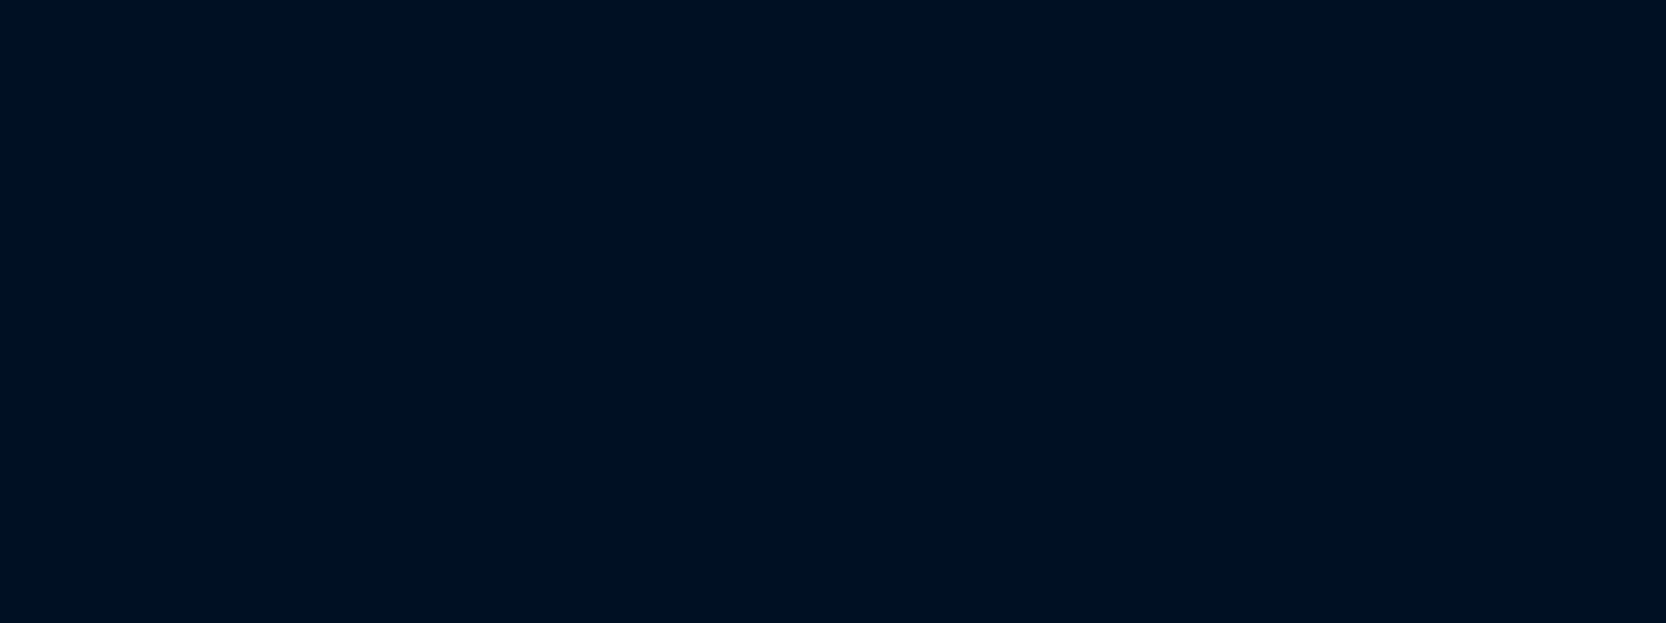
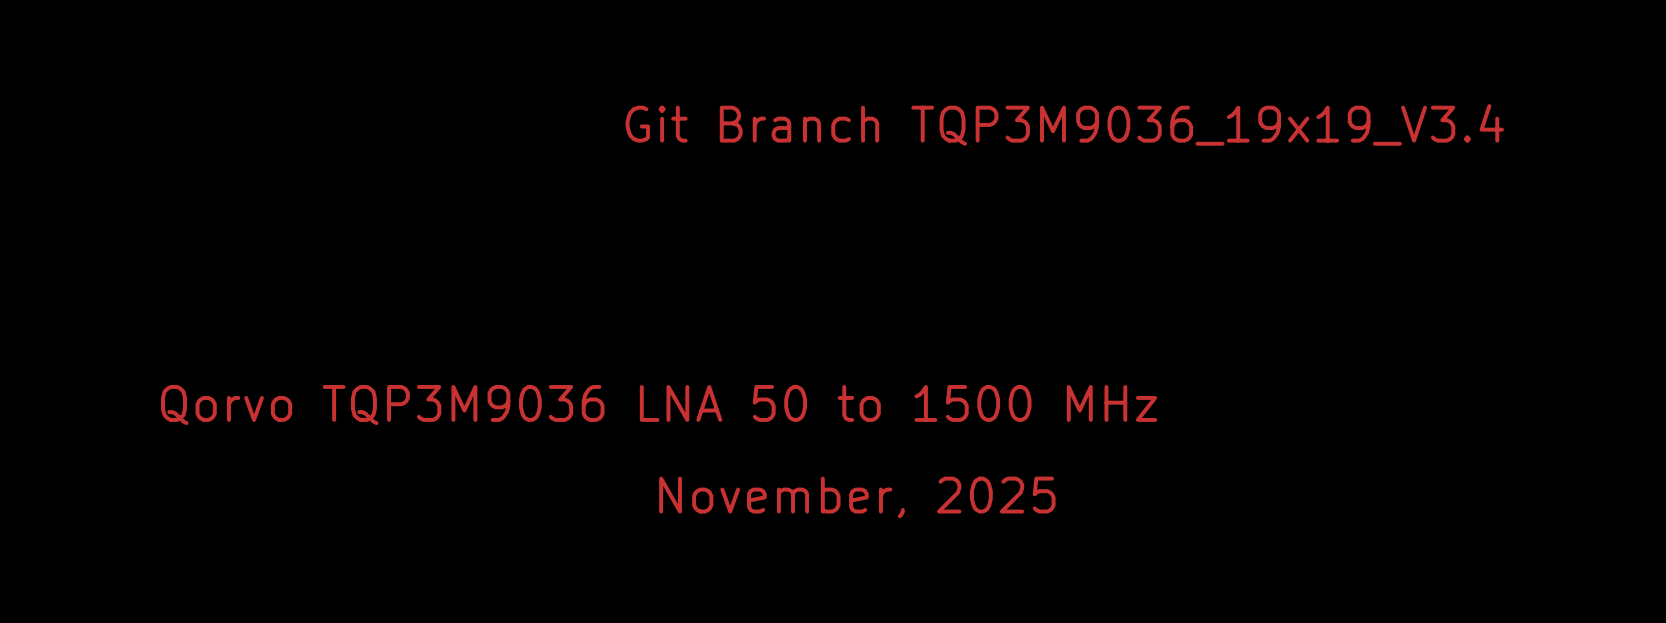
text: none -> Git Branch TQP3M9036_19x19_V3.4 (1064, 124)
text: none -> Qorvo TQP3M9036 LNA 50 to 1500 MHz (659, 405)
text: none -> November, 2025 (857, 497)

